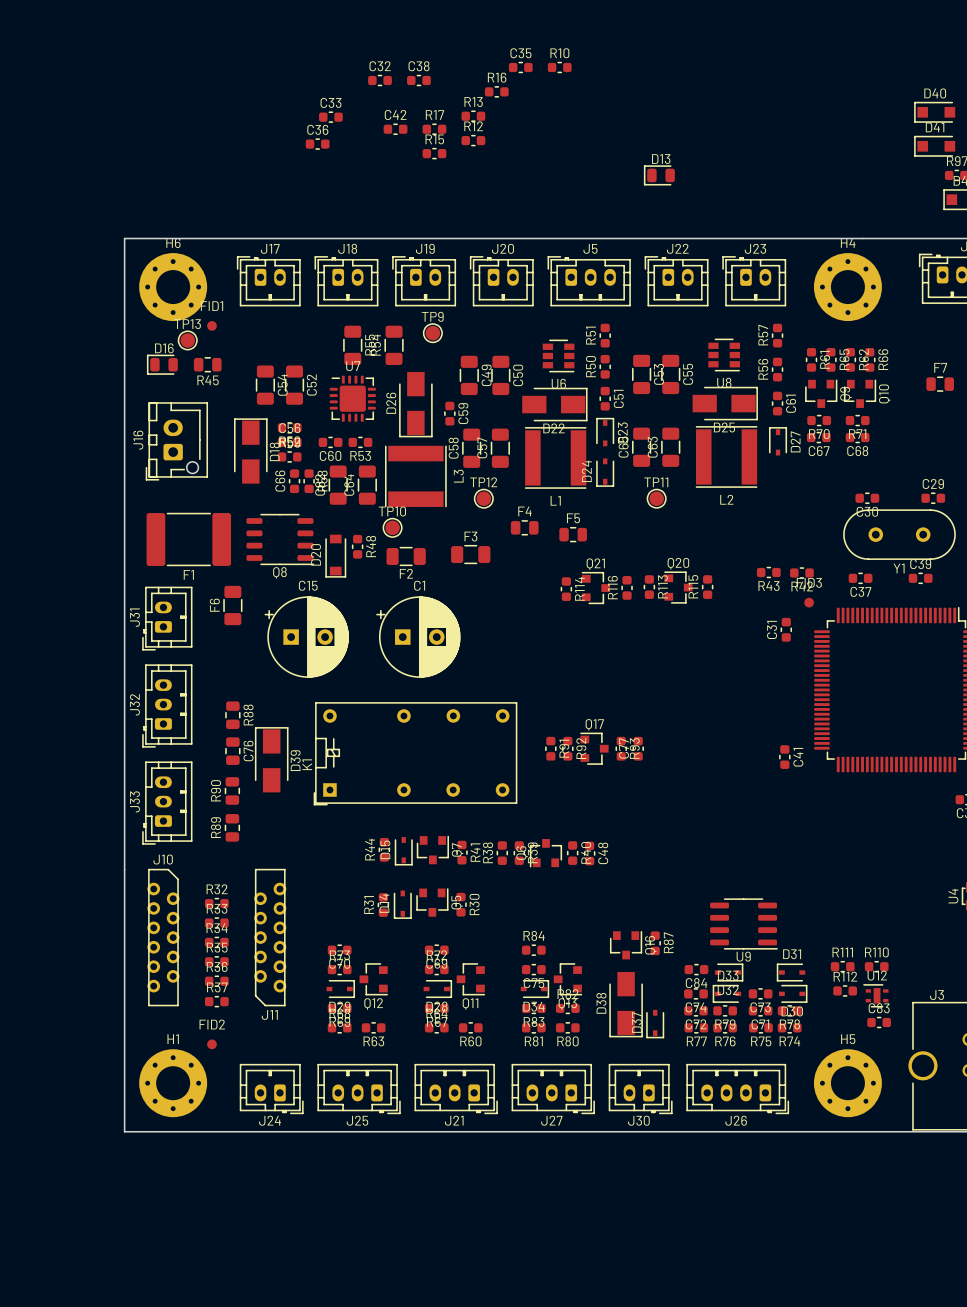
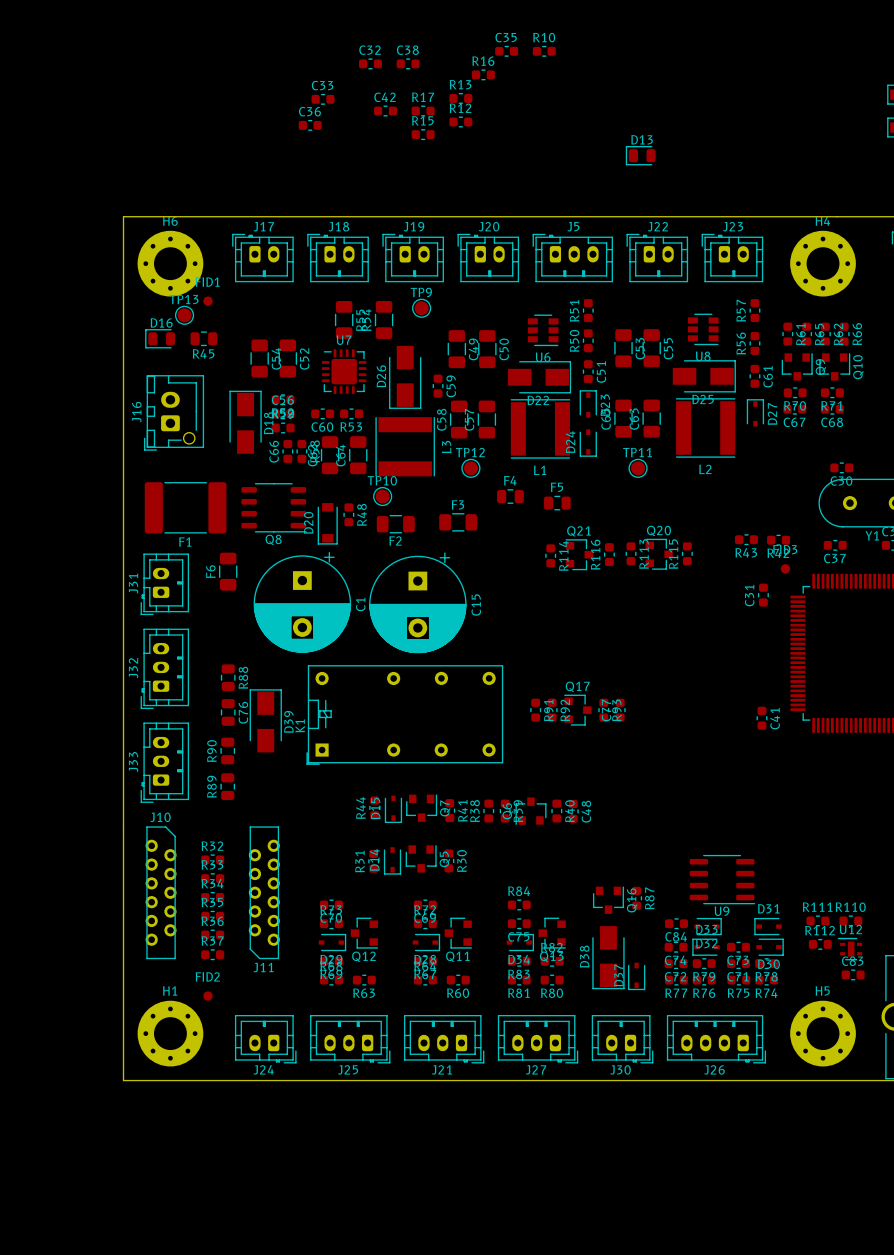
C15 name position: C15 (308, 585) -> C15 (476, 605)
C1 name position: C1 (419, 585) -> C1 (360, 604)
C15 footprint: [264, 596, 349, 678] -> [369, 552, 467, 654]
C1 footprint: [376, 596, 461, 678] -> [253, 552, 352, 653]

